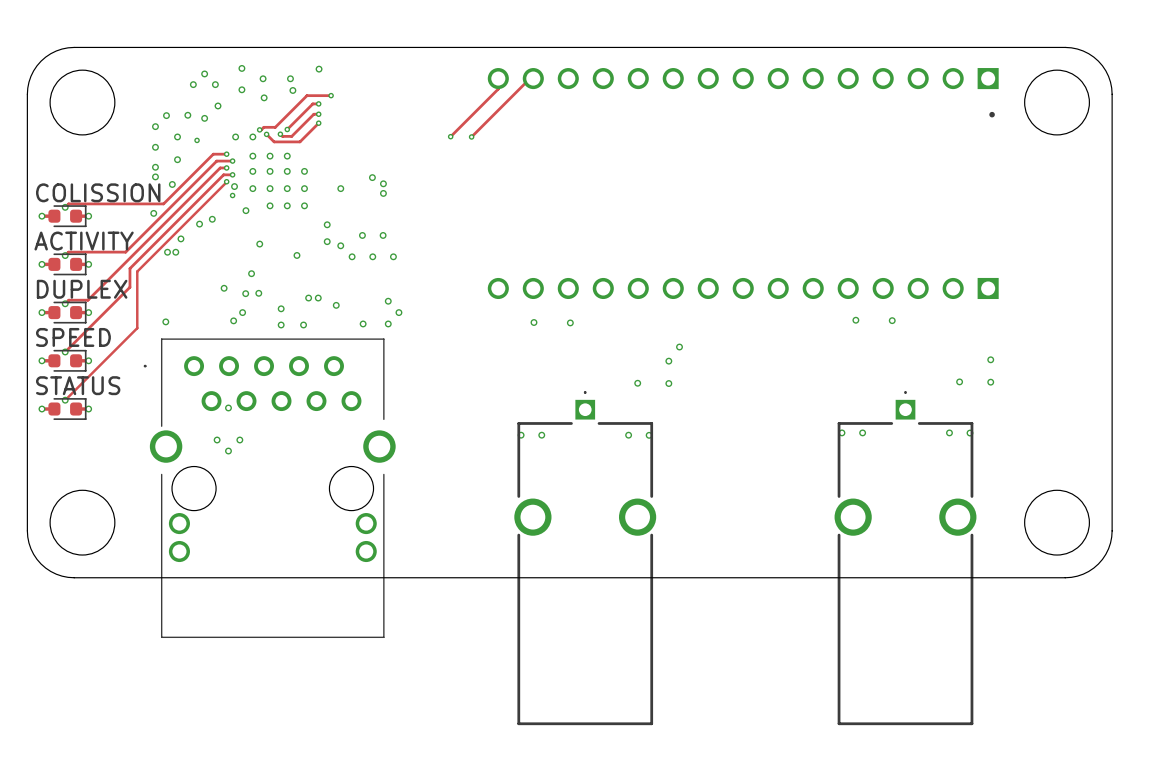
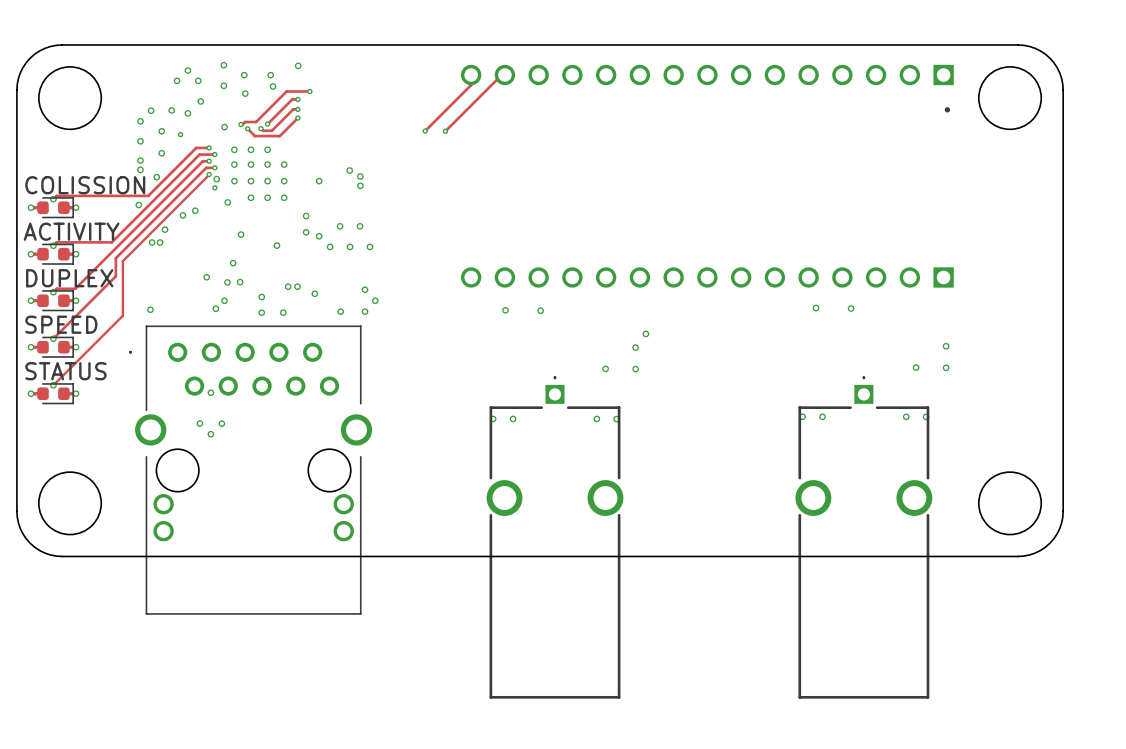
via: none -> (224, 127)
via: (235, 136) -> none
via: (252, 136) -> none

